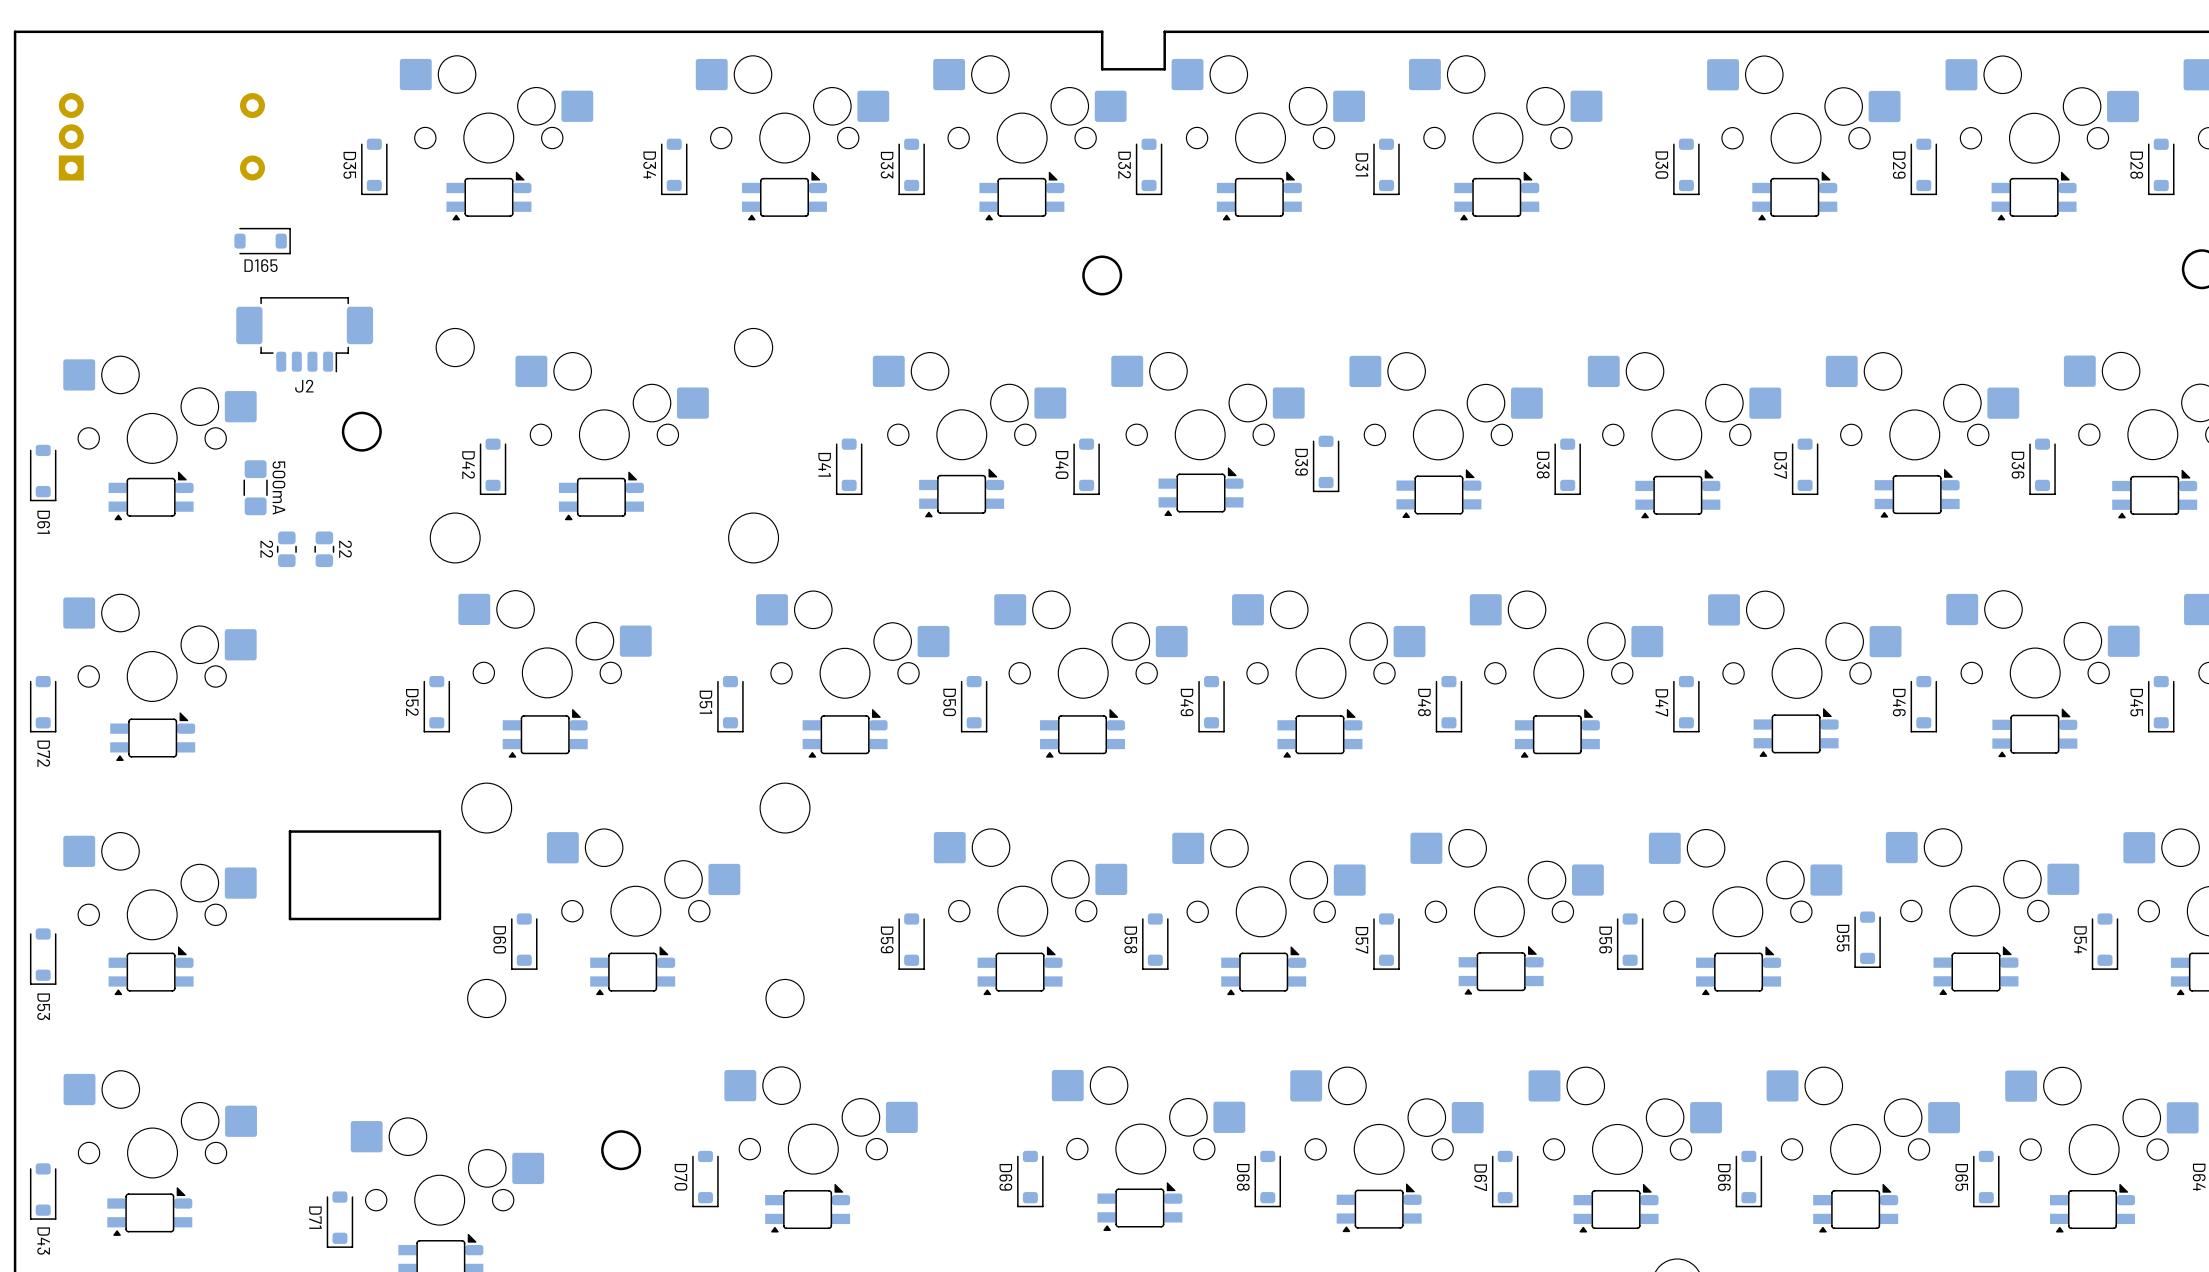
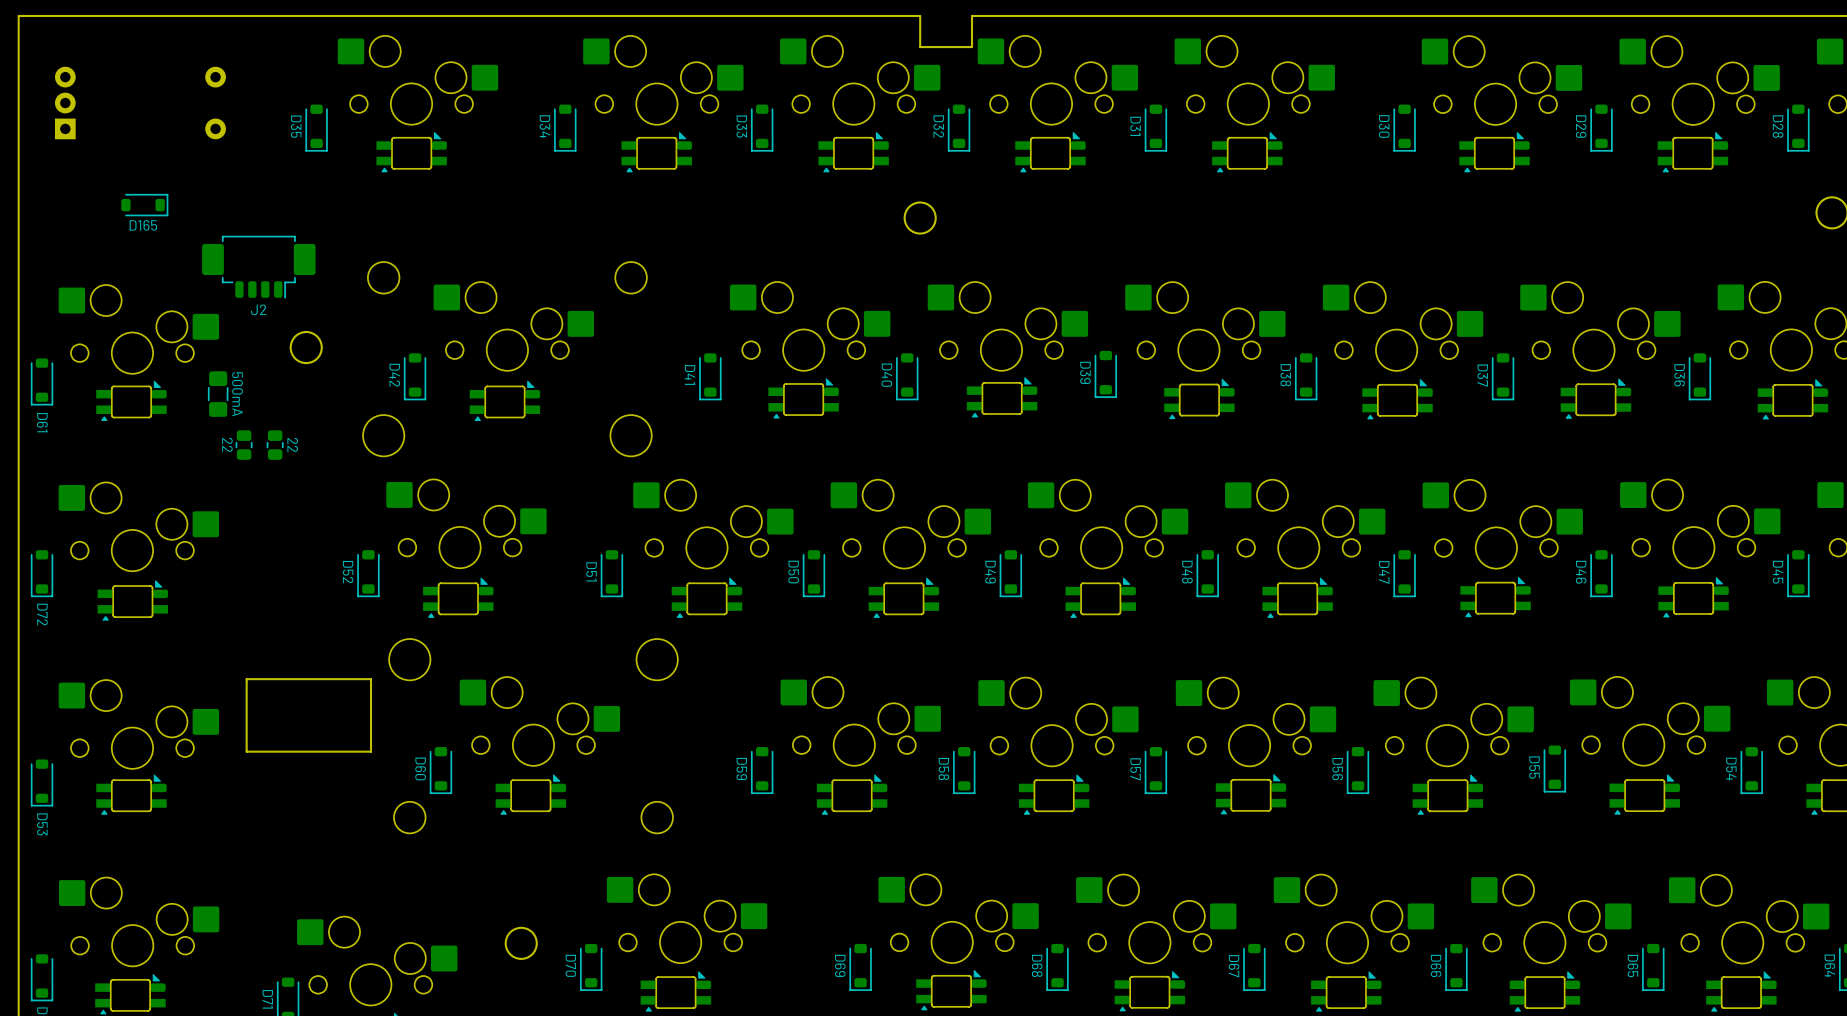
D165 position: (262, 241) -> (144, 205)

